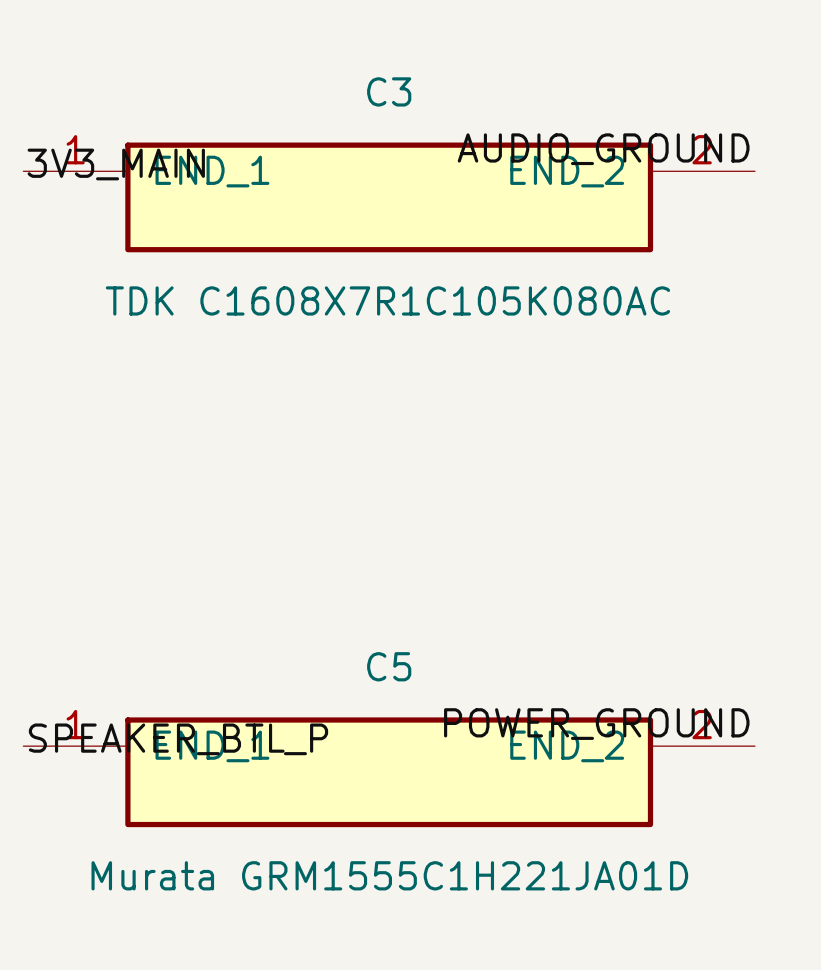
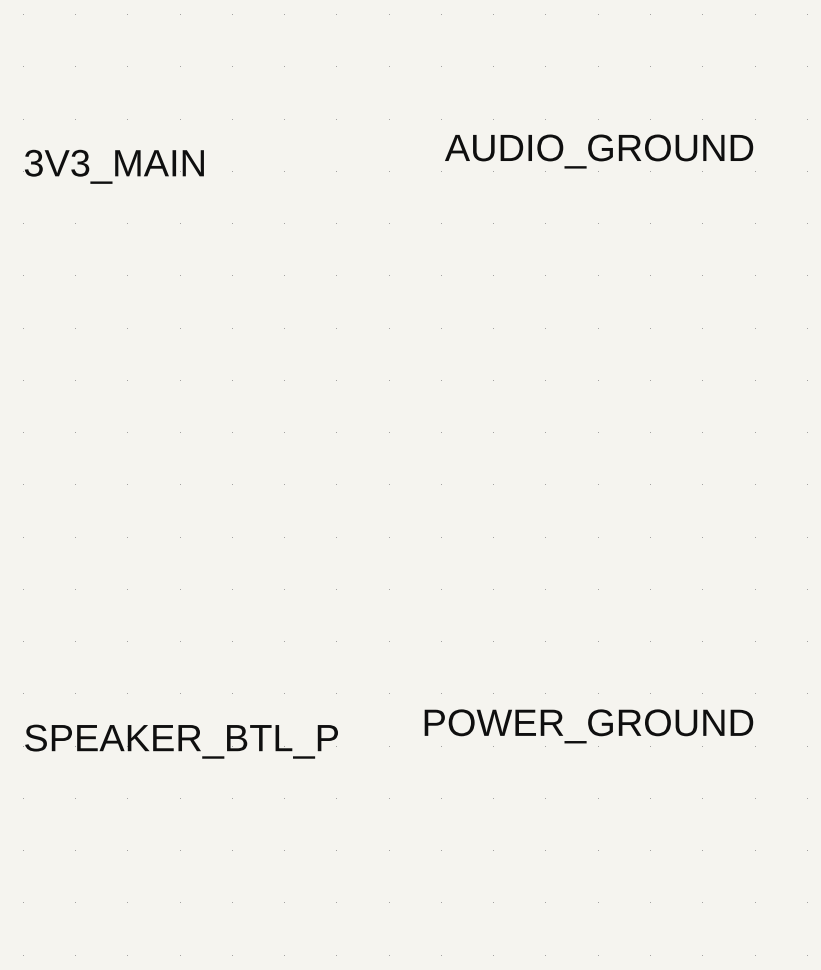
C3: TDK C1608X7R1C105K080AC (389, 197) -> none
C5: Murata GRM1555C1H221JA01D (389, 772) -> none

